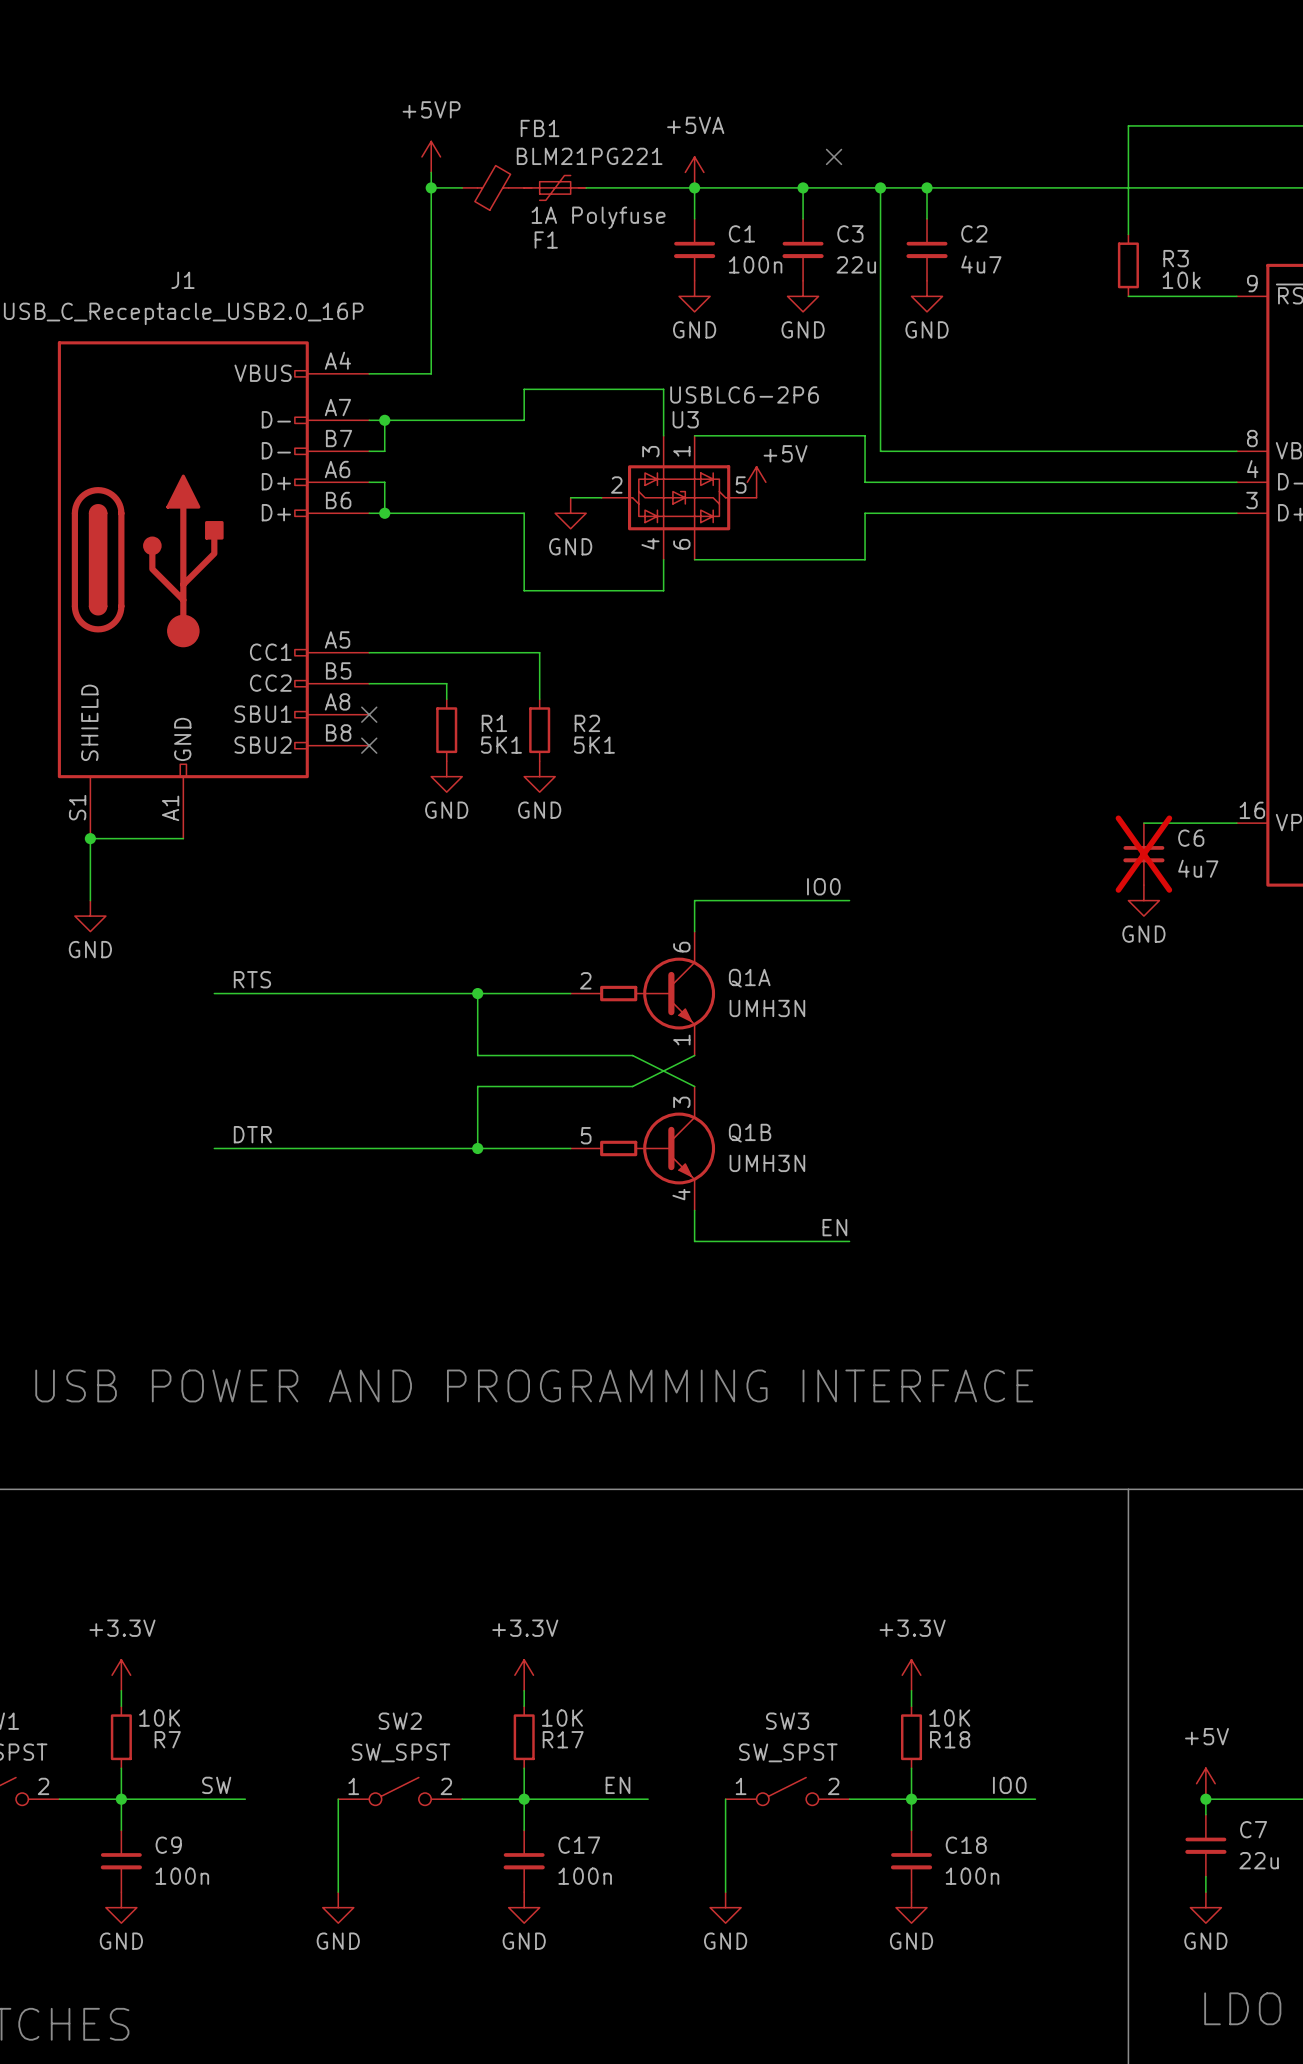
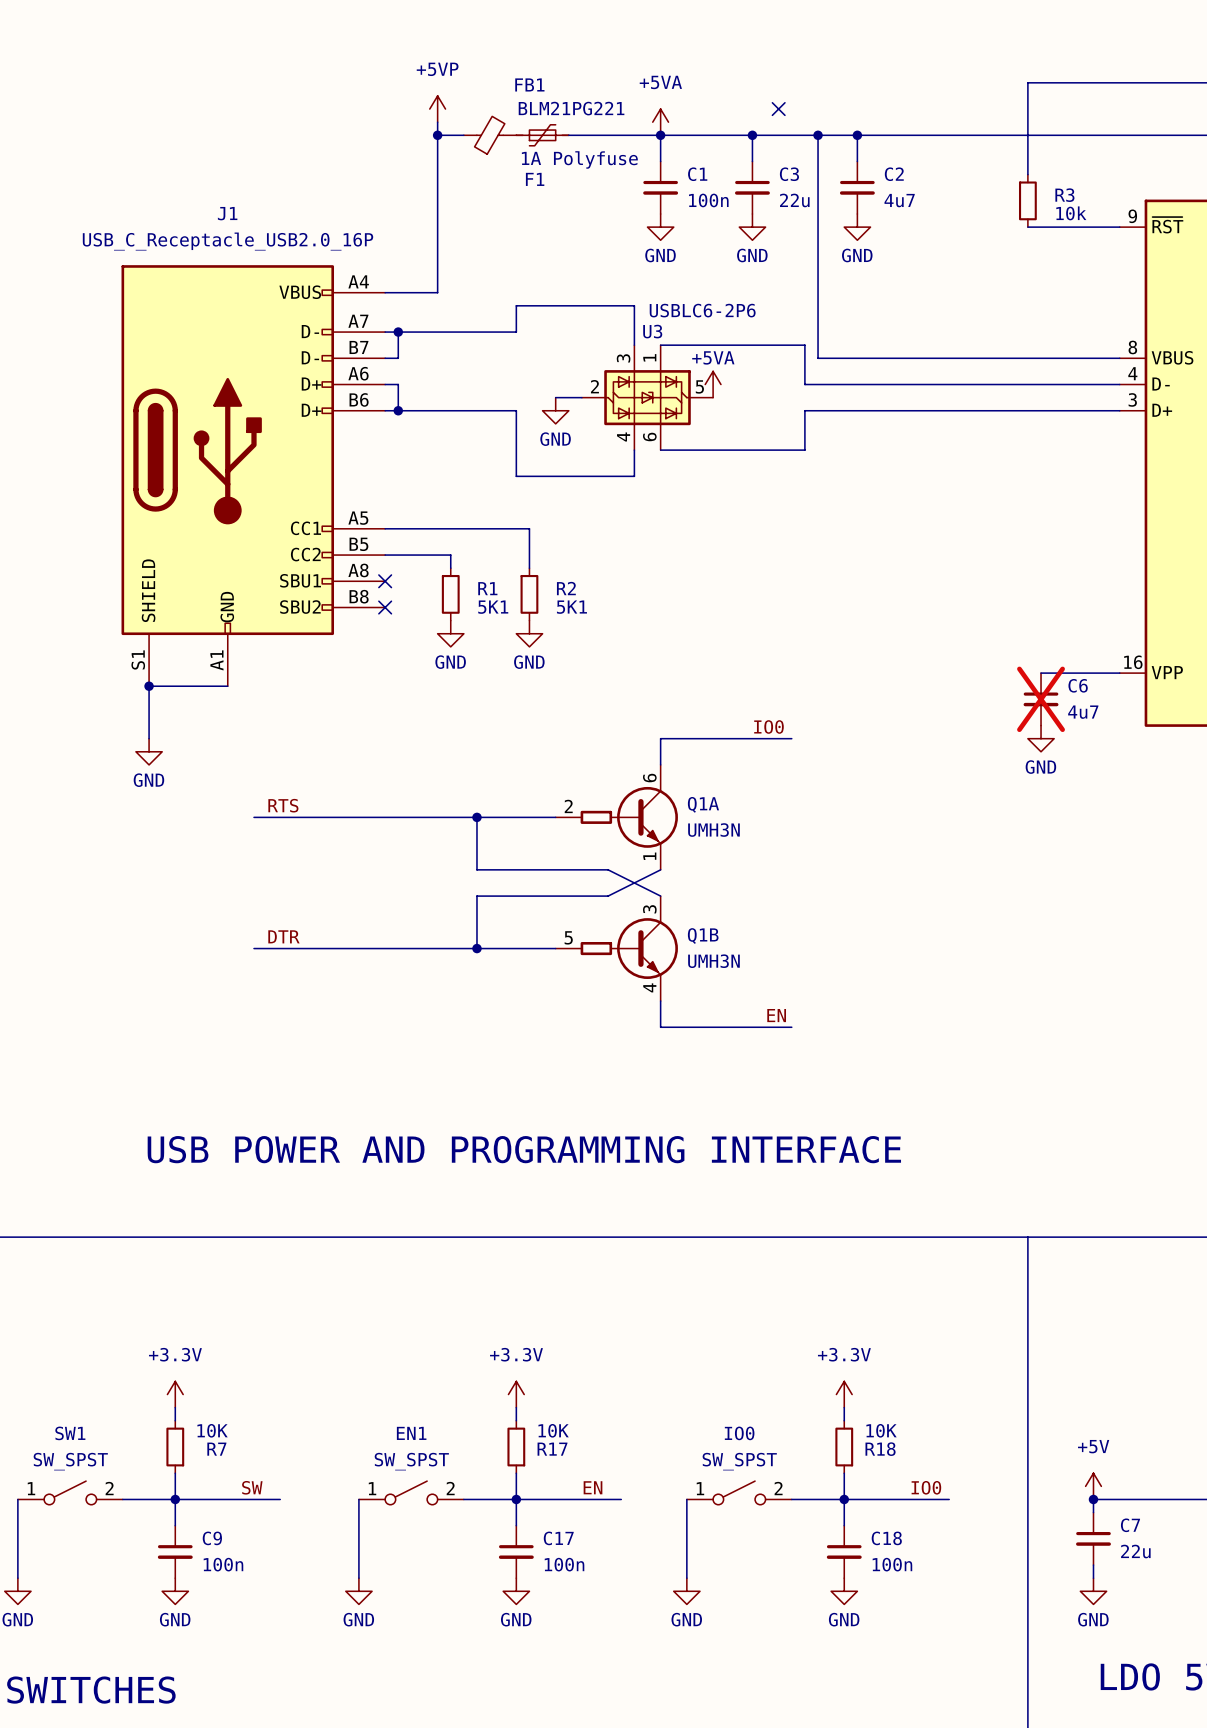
power symbol: +5V (756, 482) -> +5VA (713, 384)
SW2 name: SW2 (400, 1721) -> EN1 (411, 1433)
SW3 name: SW3 (787, 1721) -> IO0 (739, 1433)

